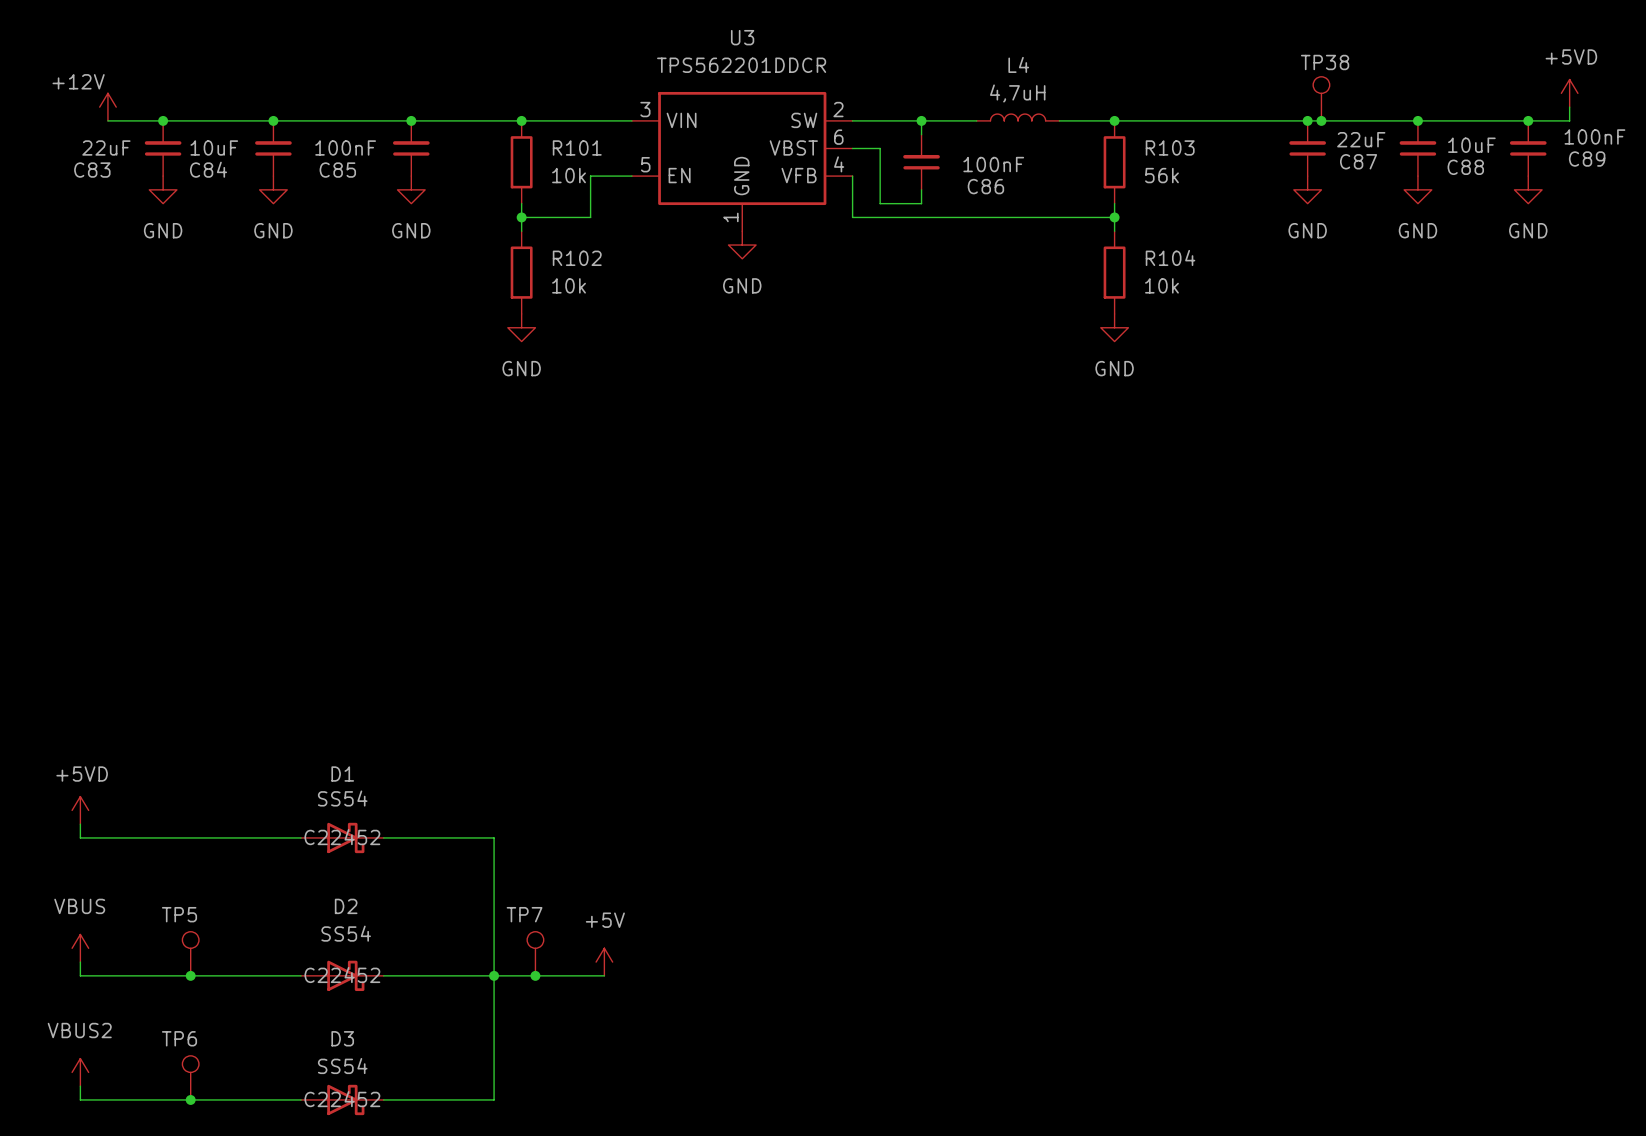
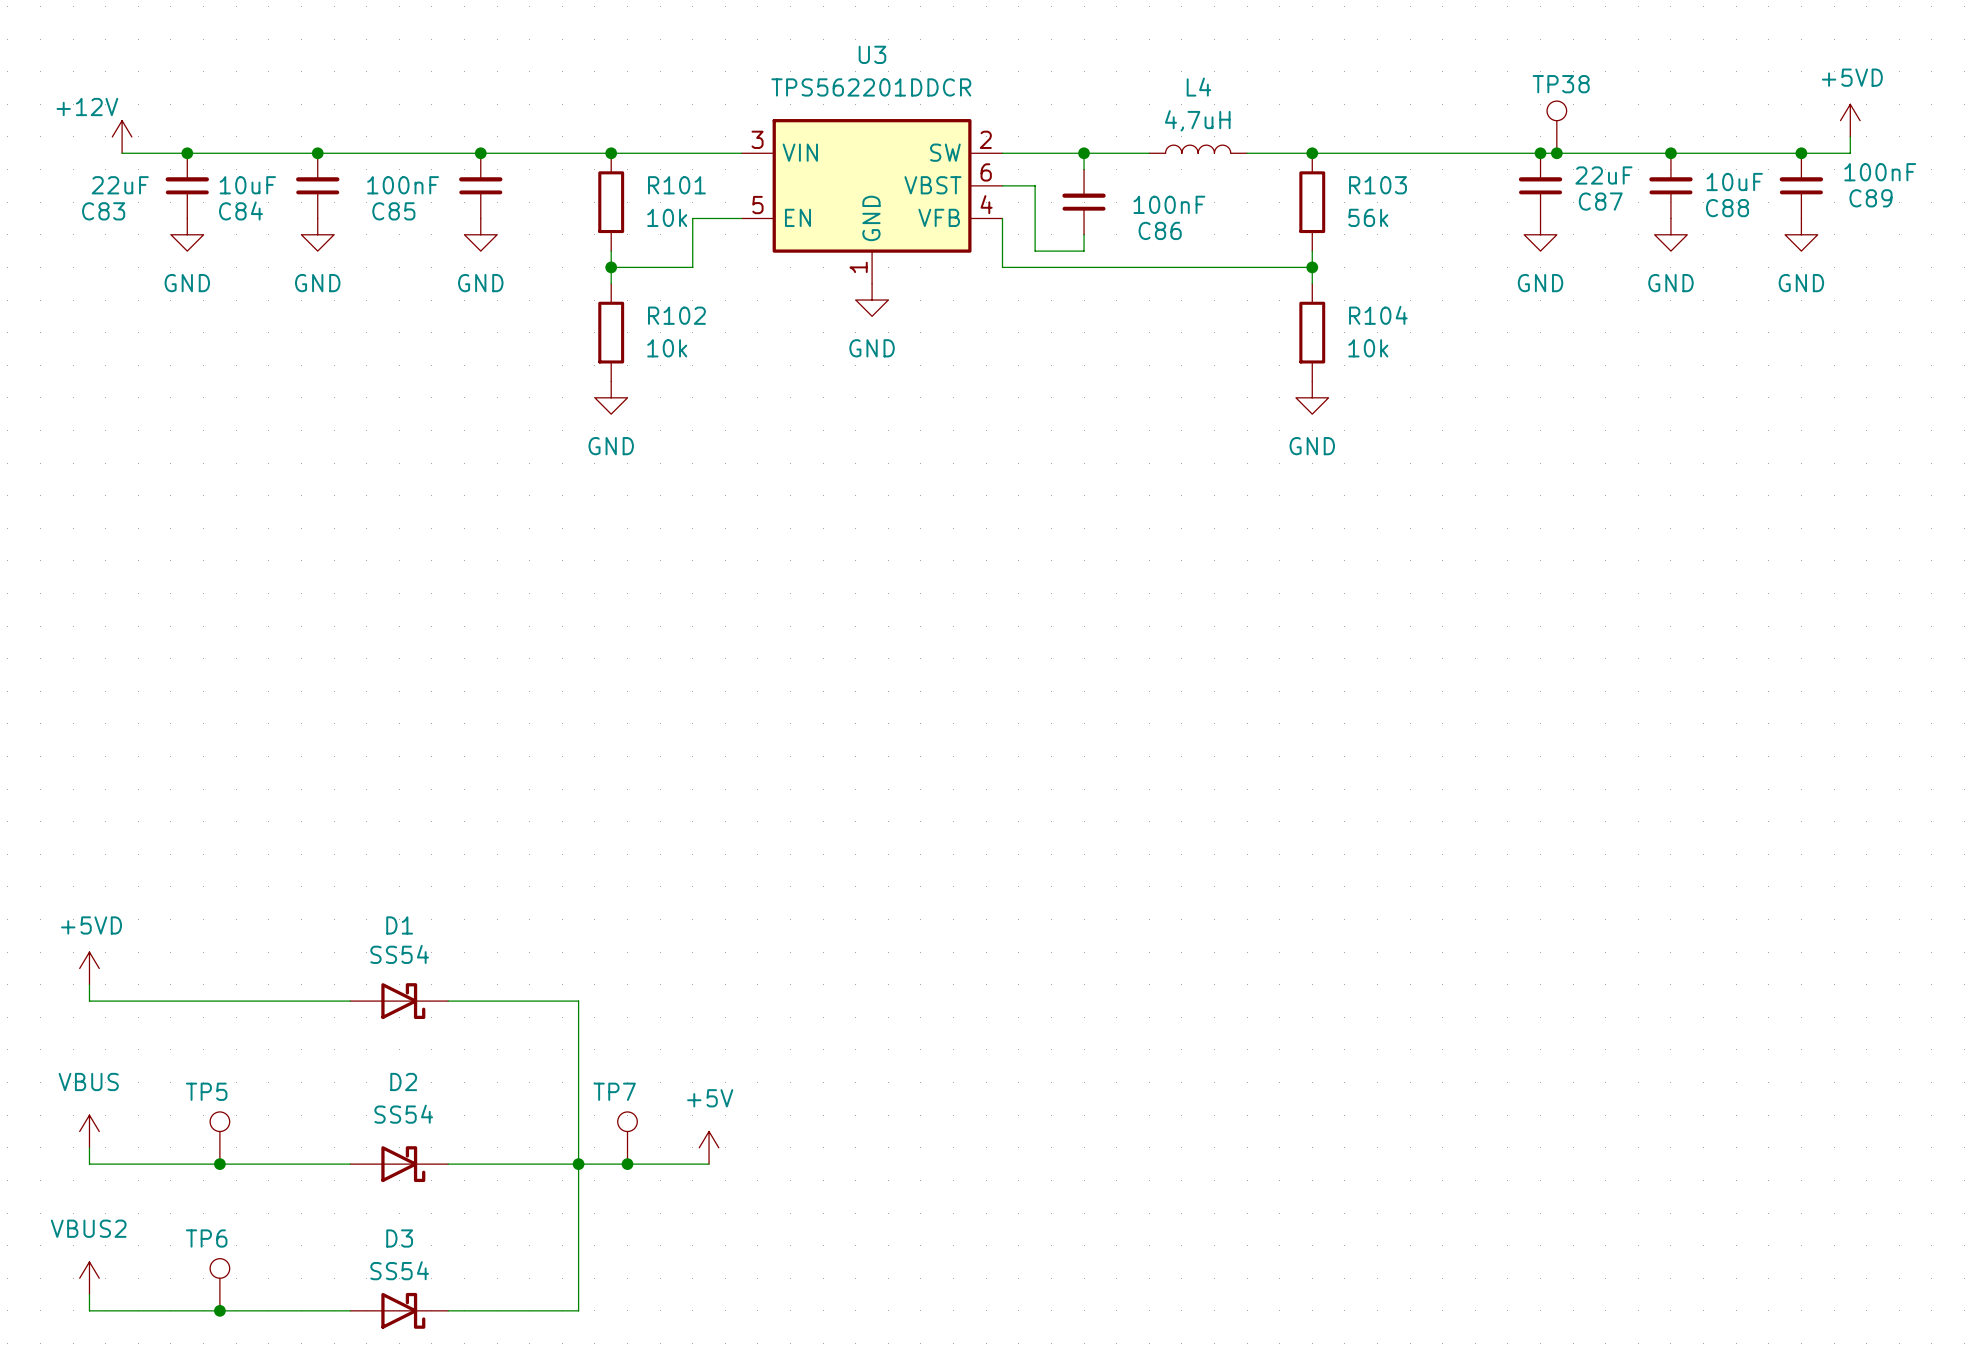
D1 text: C22452 (342, 837) -> none
D2 text: C22452 (342, 975) -> none
D3 text: C22452 (342, 1099) -> none

